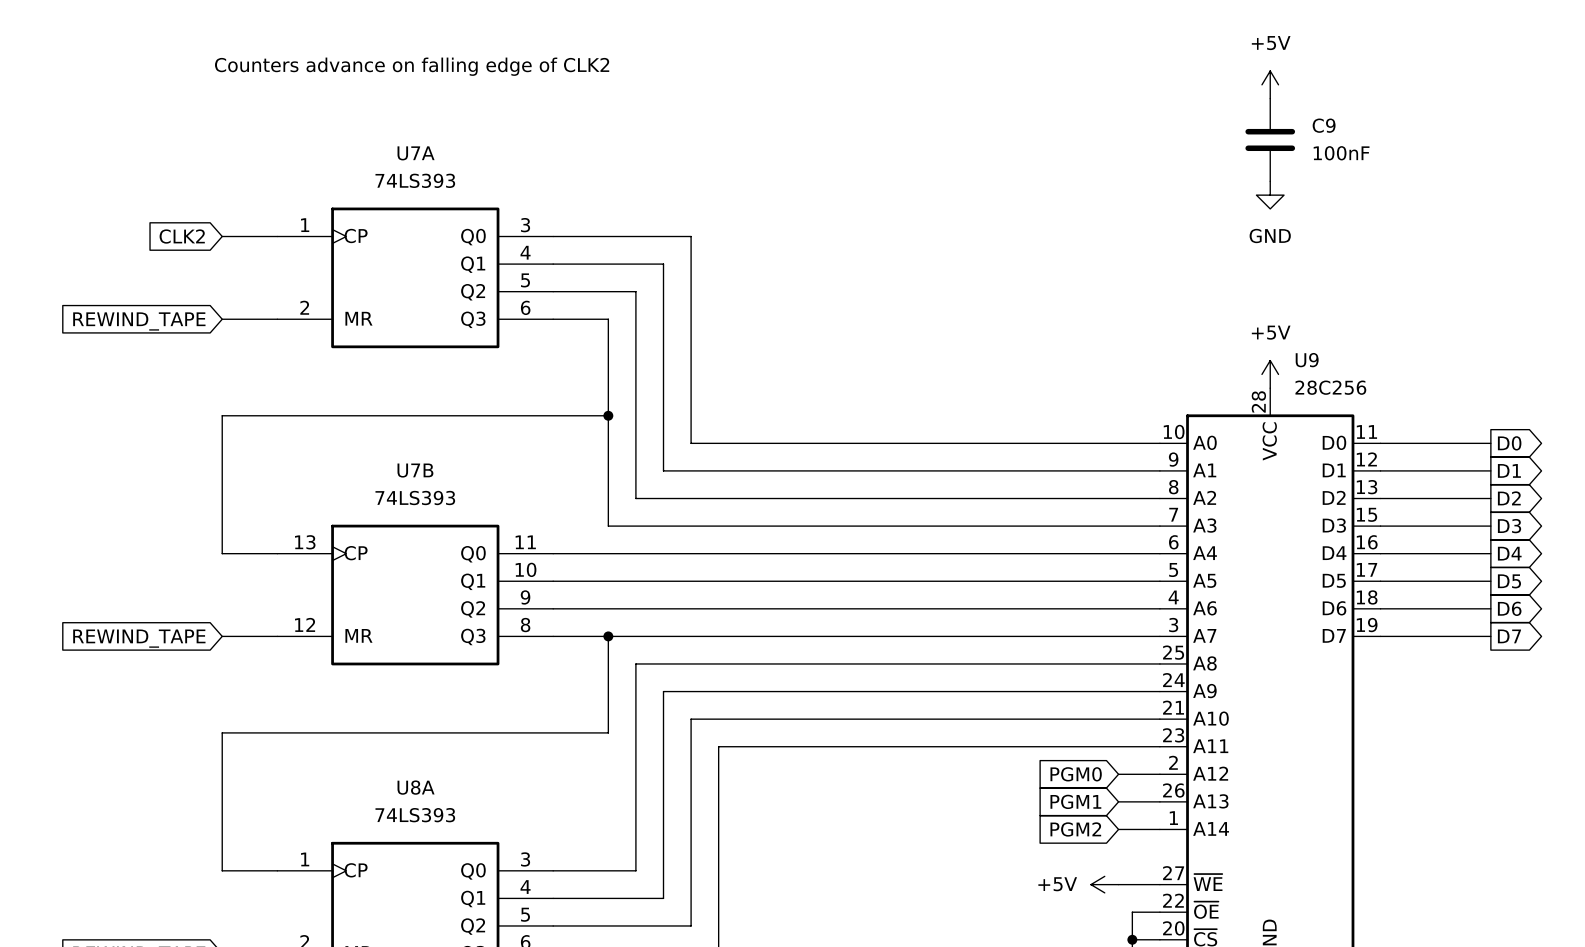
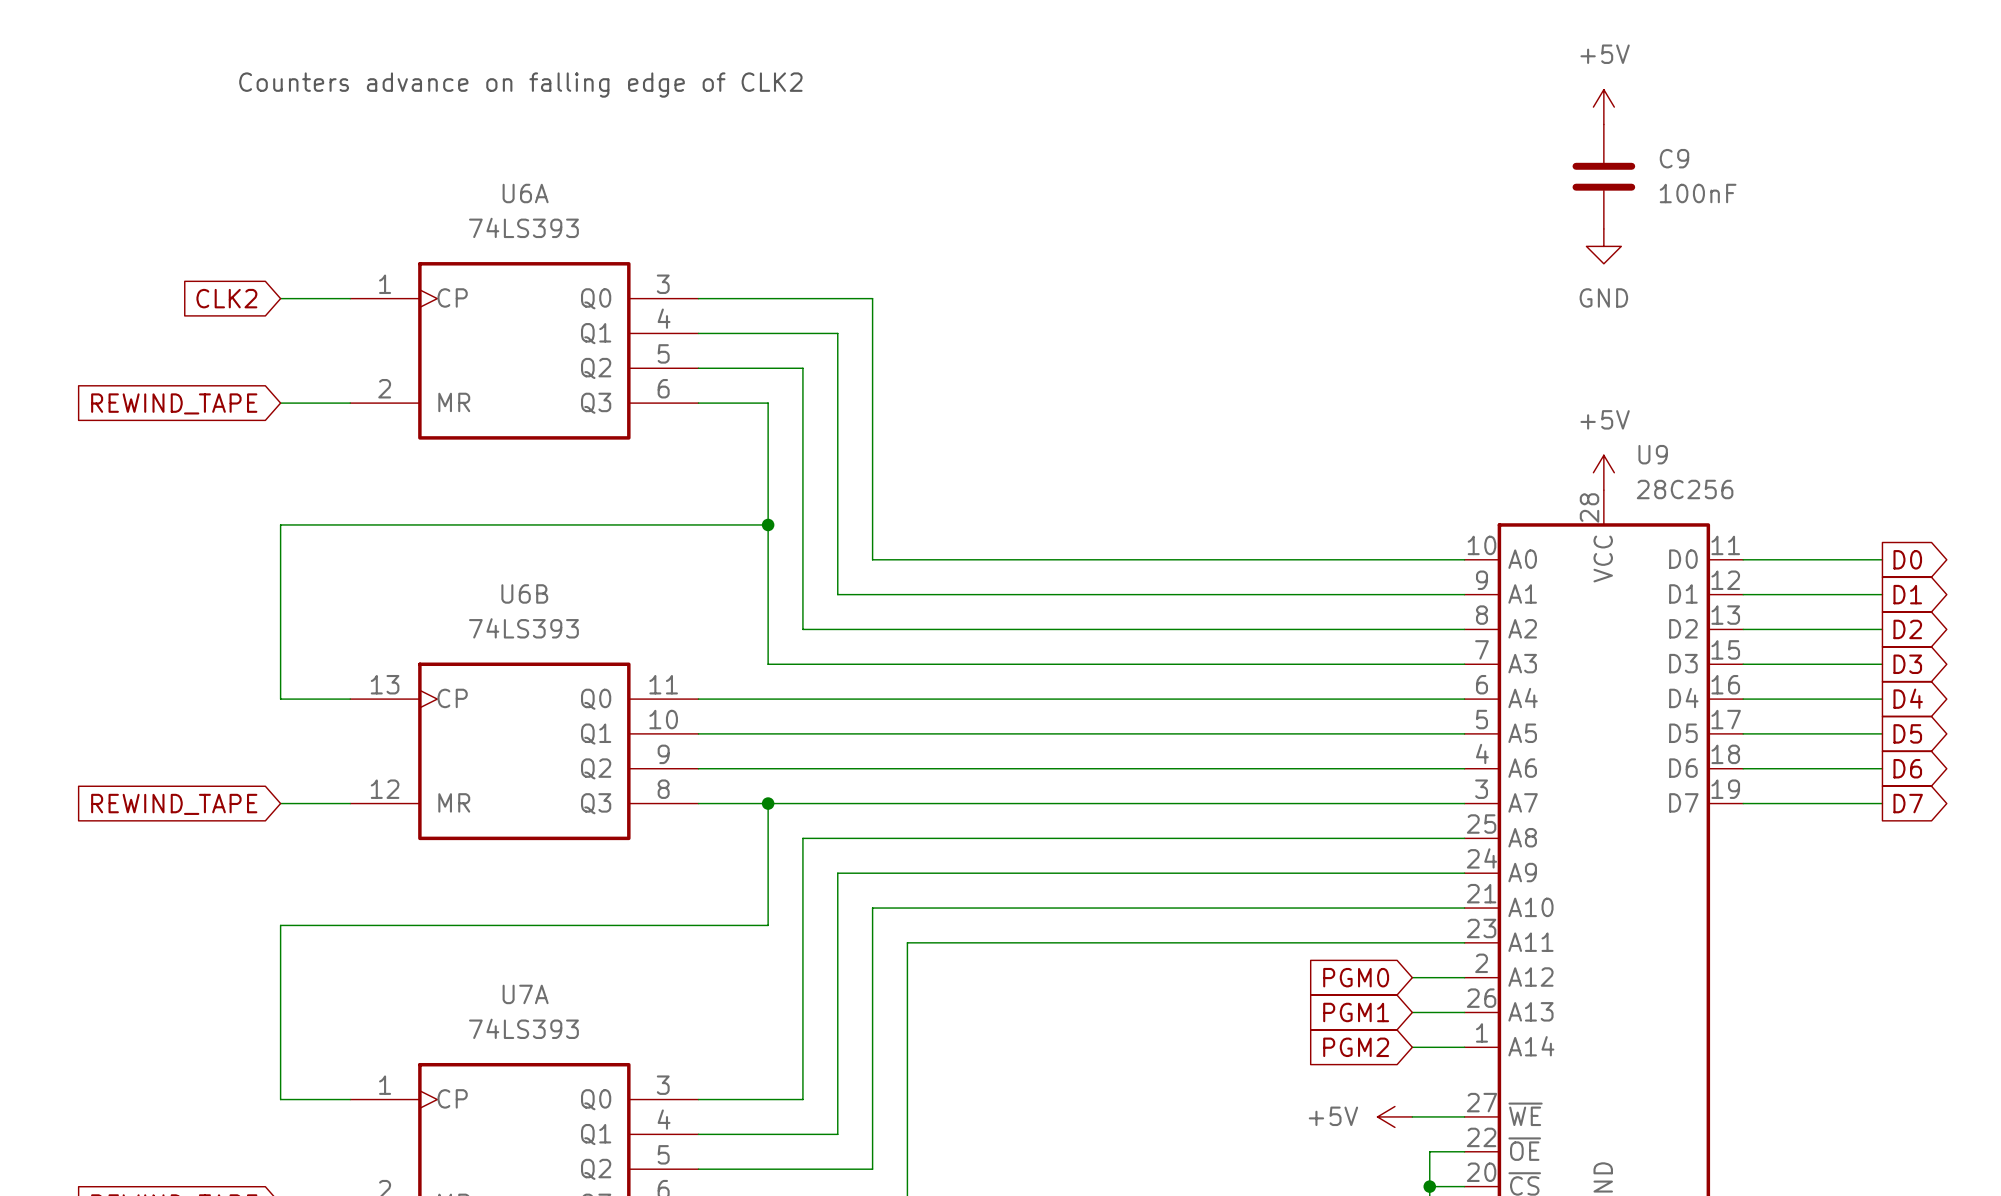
U7A name: U7A (416, 153) -> U6A (525, 193)
U7B name: U7B (415, 470) -> U6B (524, 593)
U8A name: U8A (416, 787) -> U7A (525, 994)

